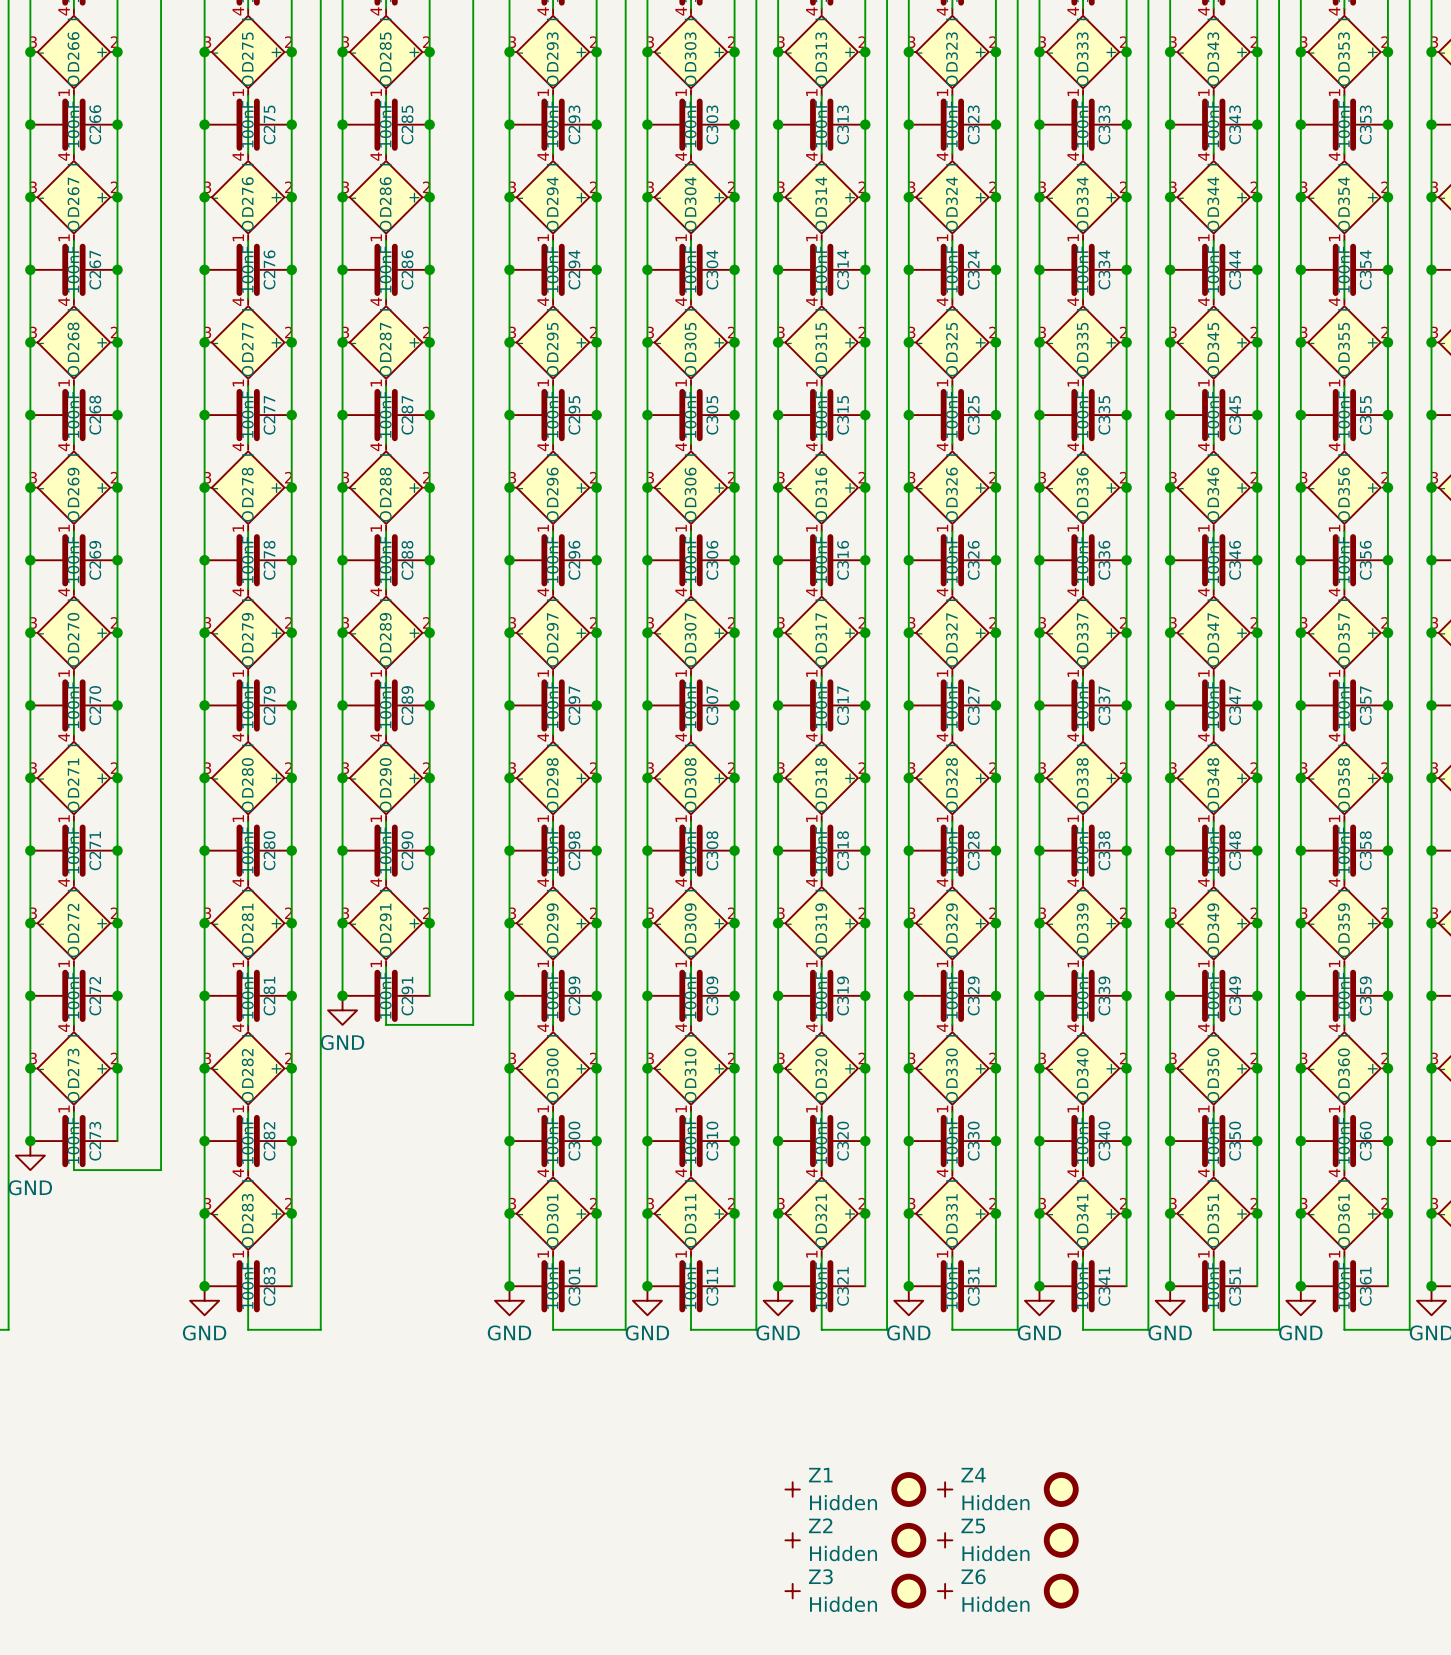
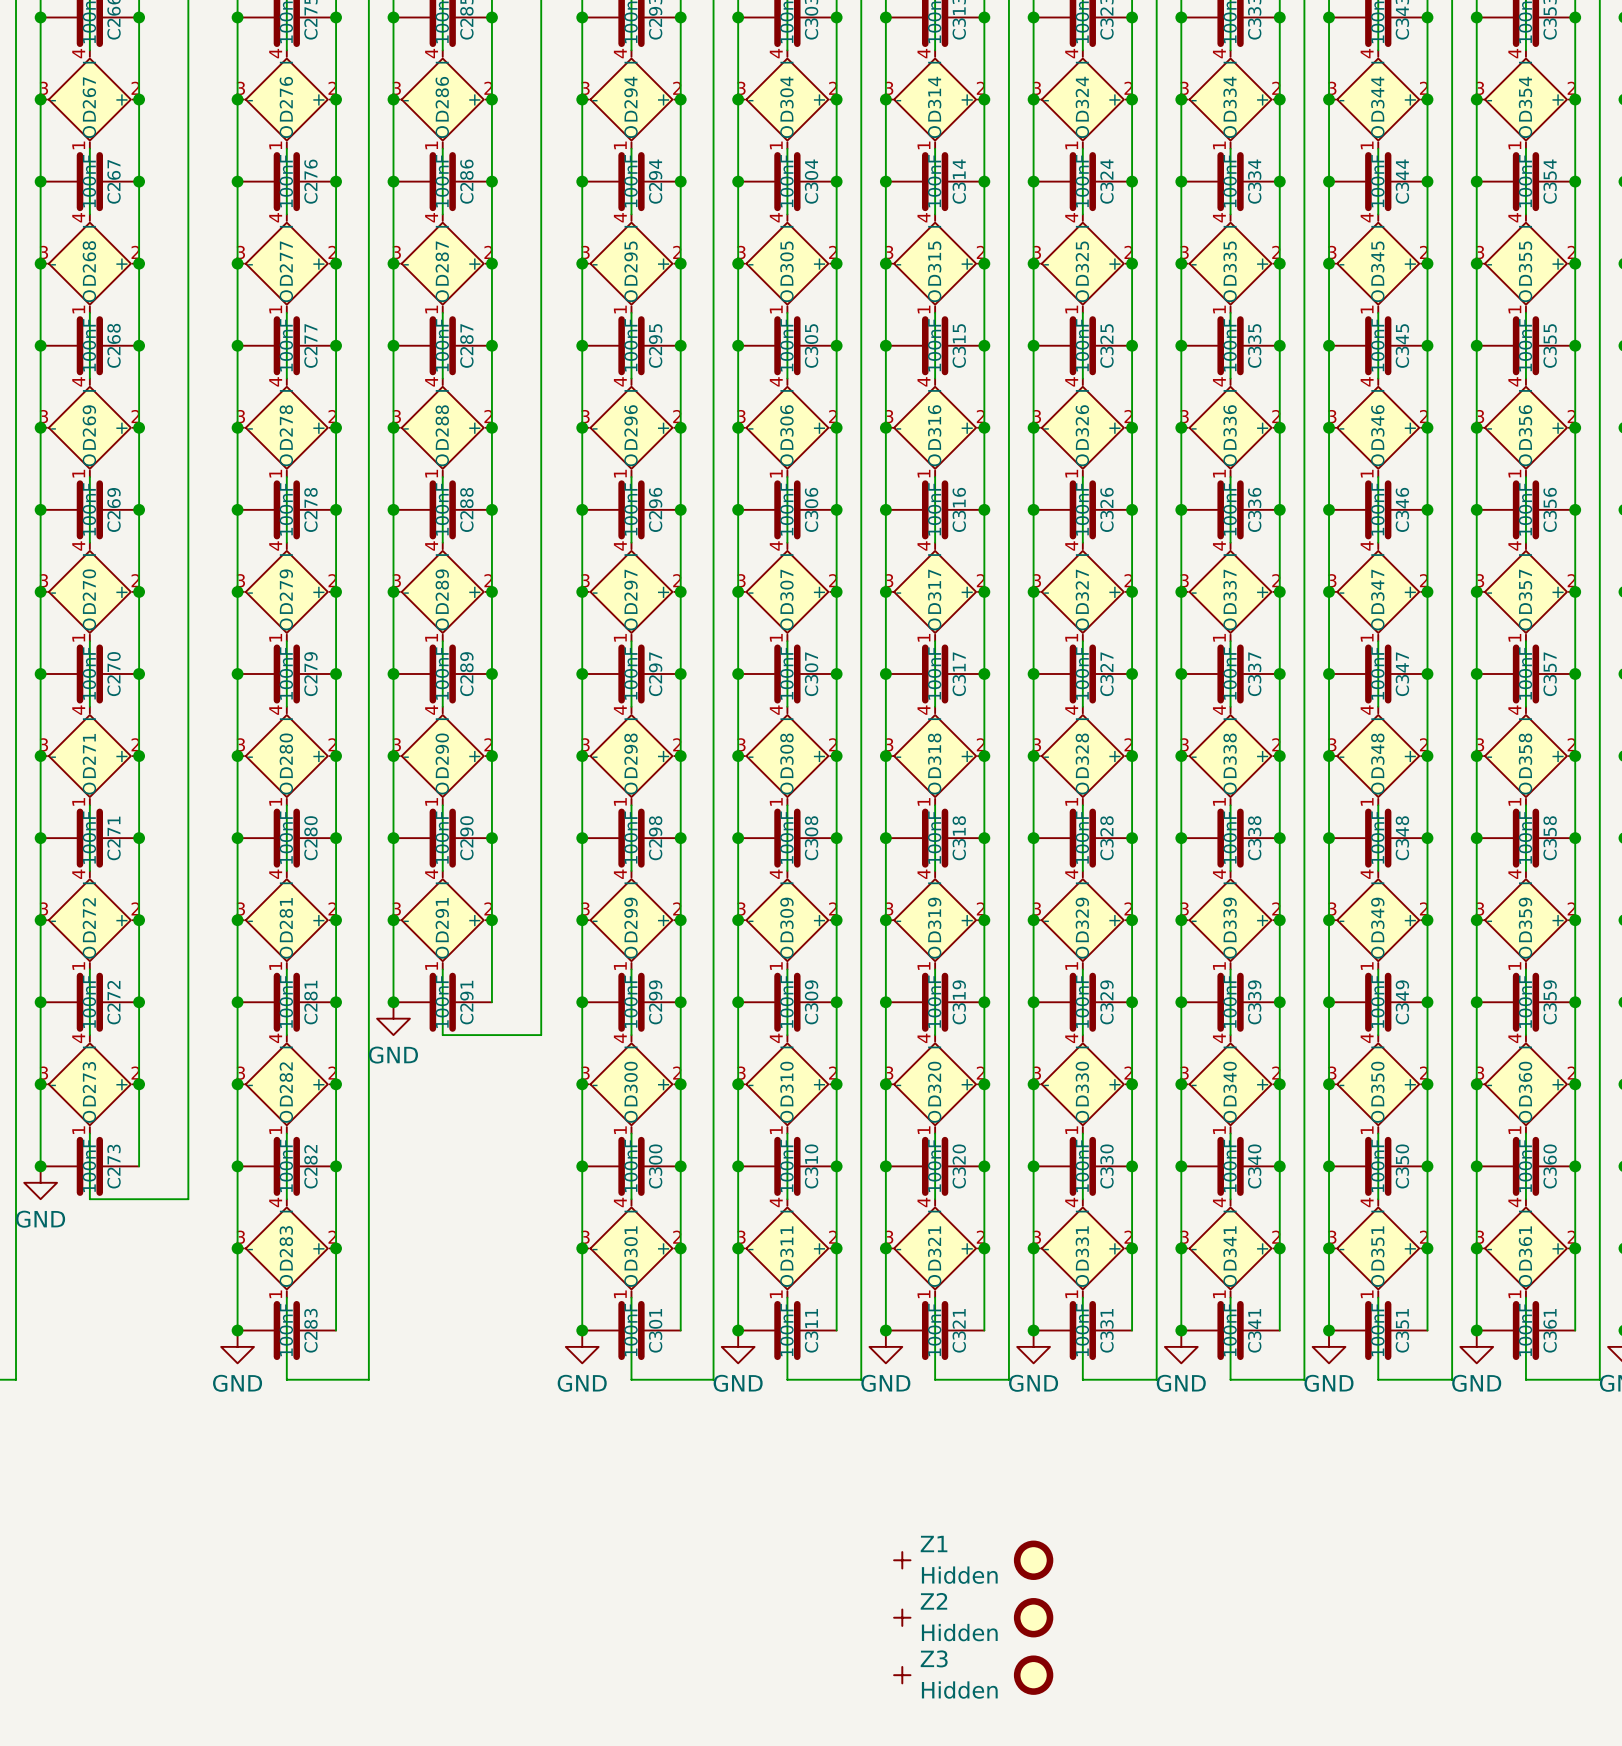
Z4: Hidden (945, 1489) -> none
part: (1061, 1489) -> none
Z5: Hidden (945, 1540) -> none
part: (1061, 1540) -> none
Z6: Hidden (945, 1591) -> none
part: (1061, 1591) -> none

